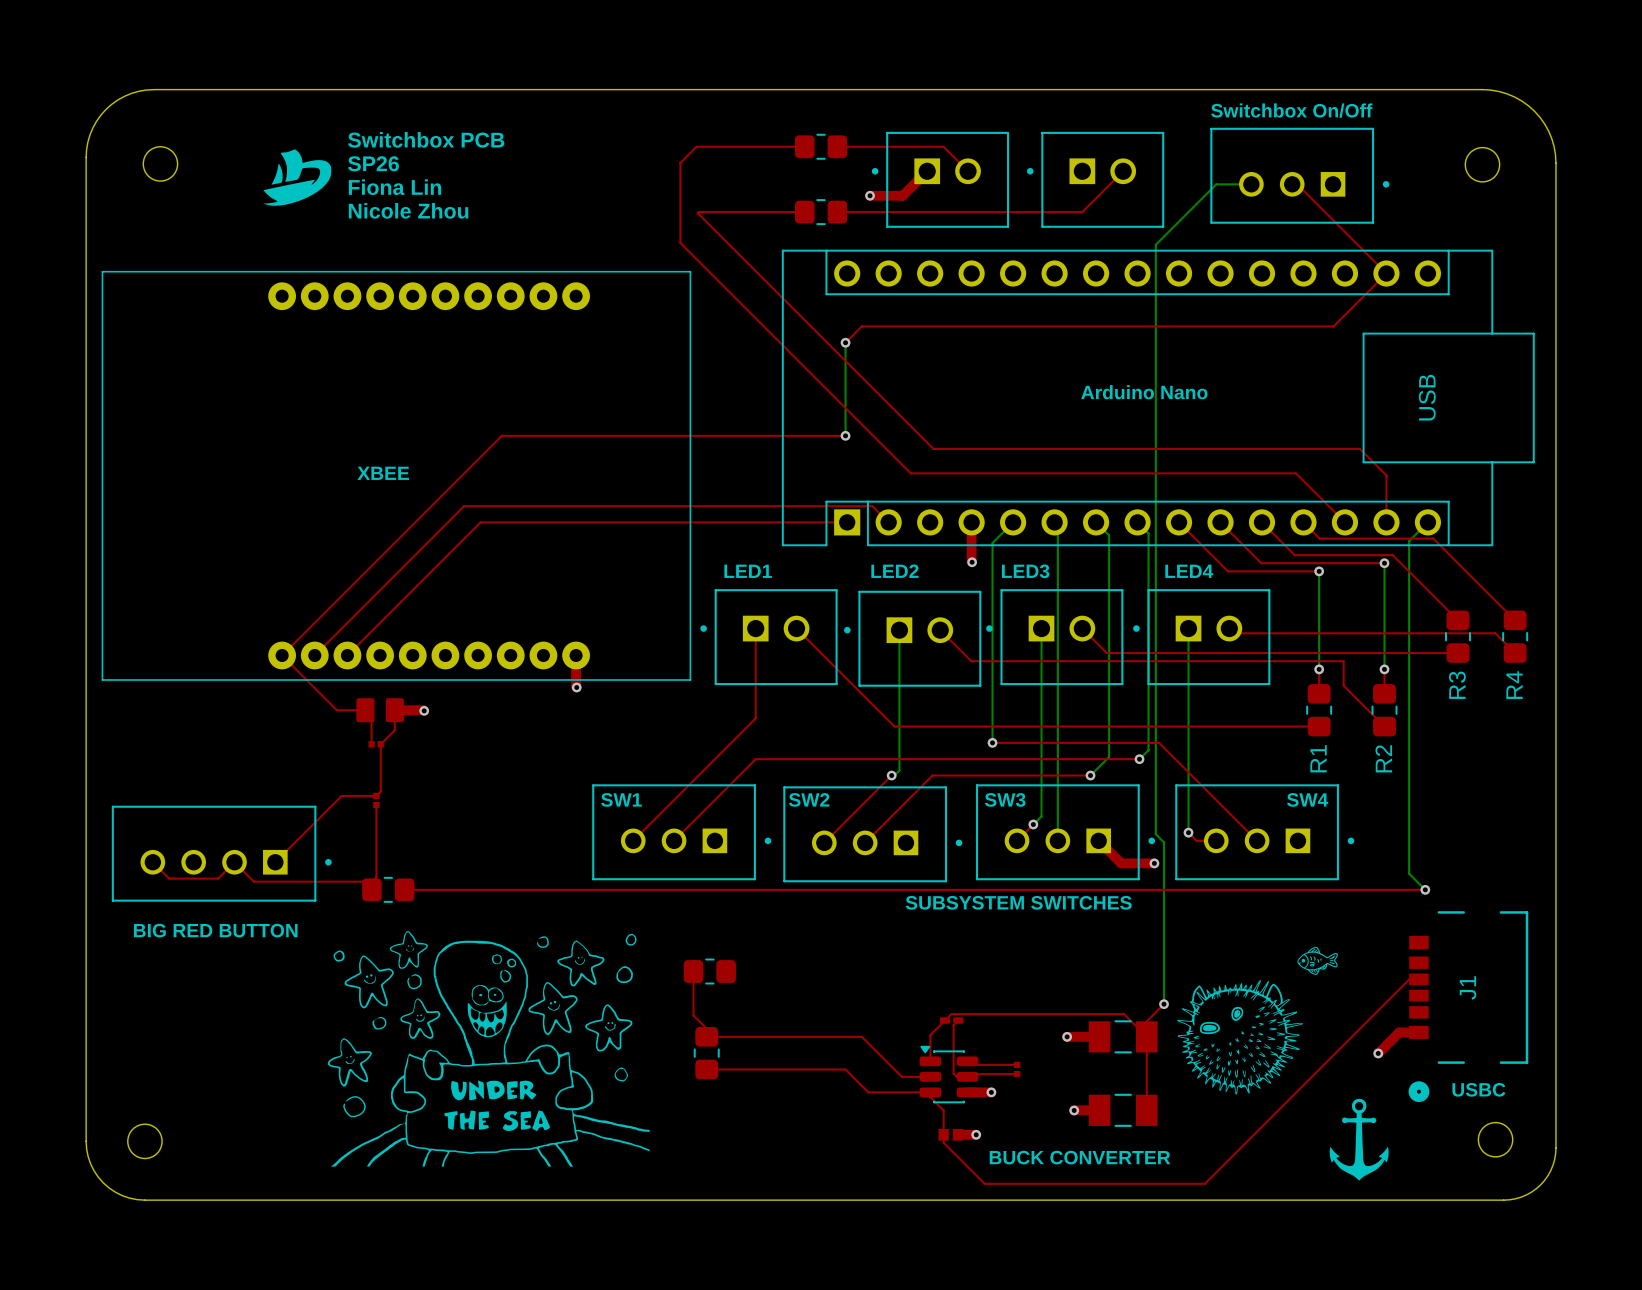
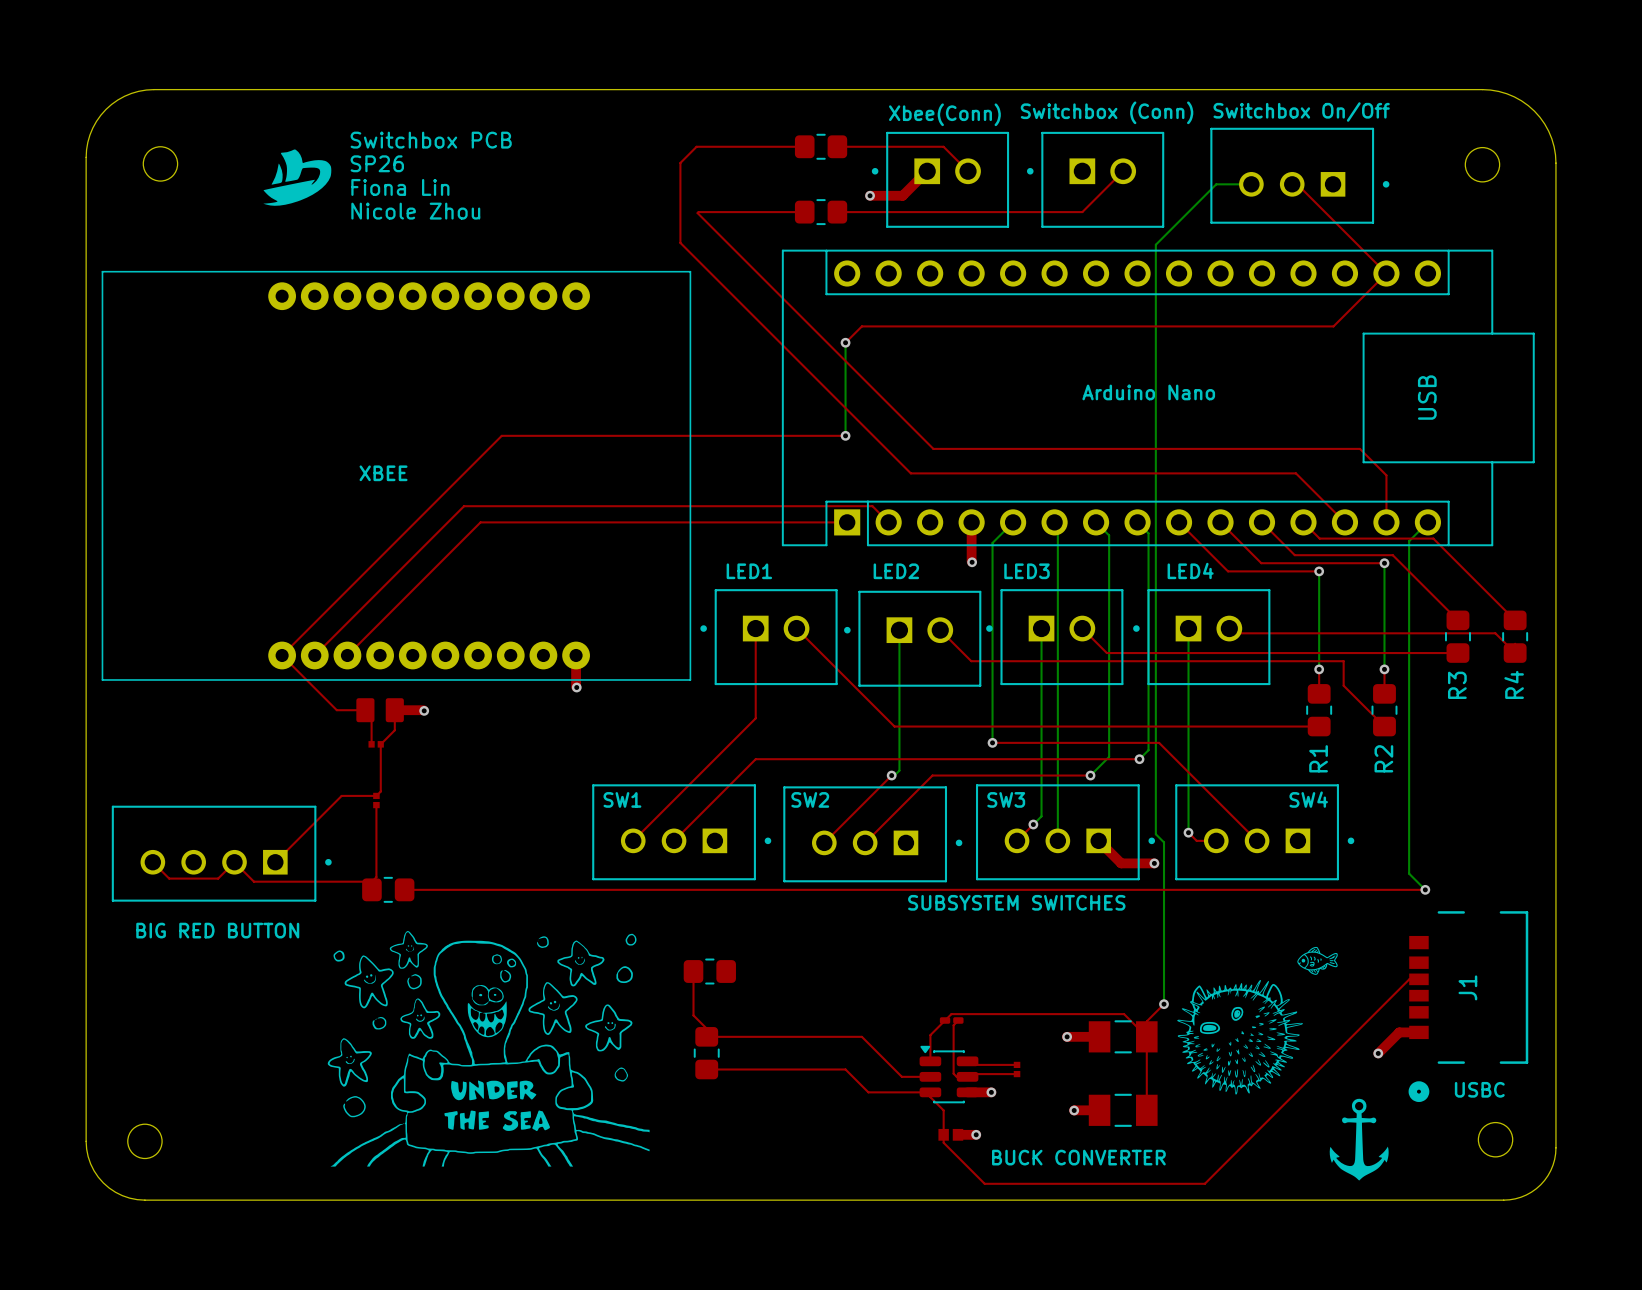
text: none -> Switchbox (Conn) (1107, 112)
text: none -> Xbee(Conn) (944, 114)

